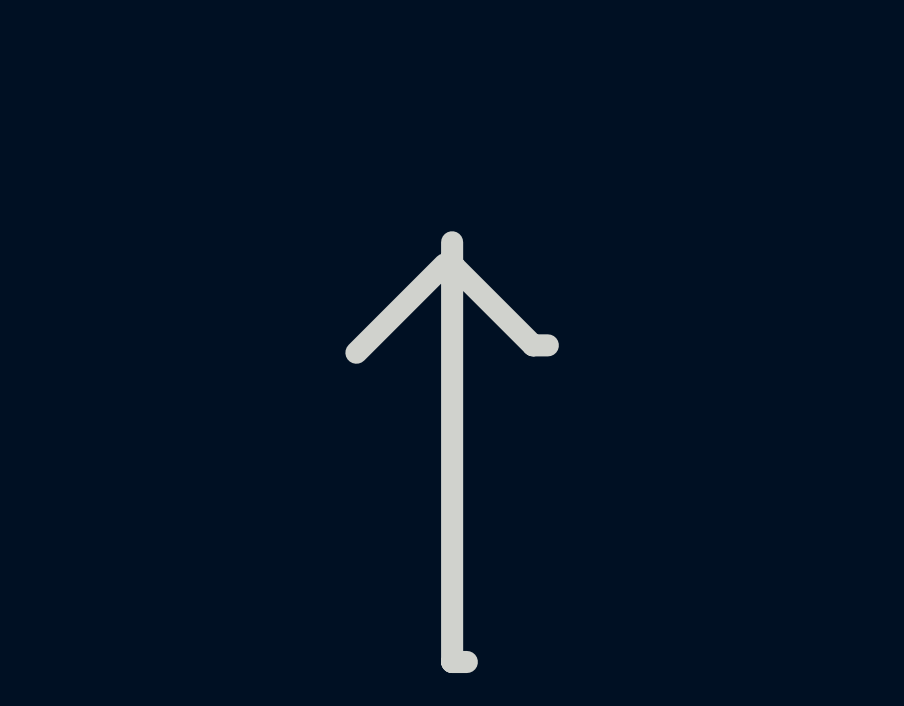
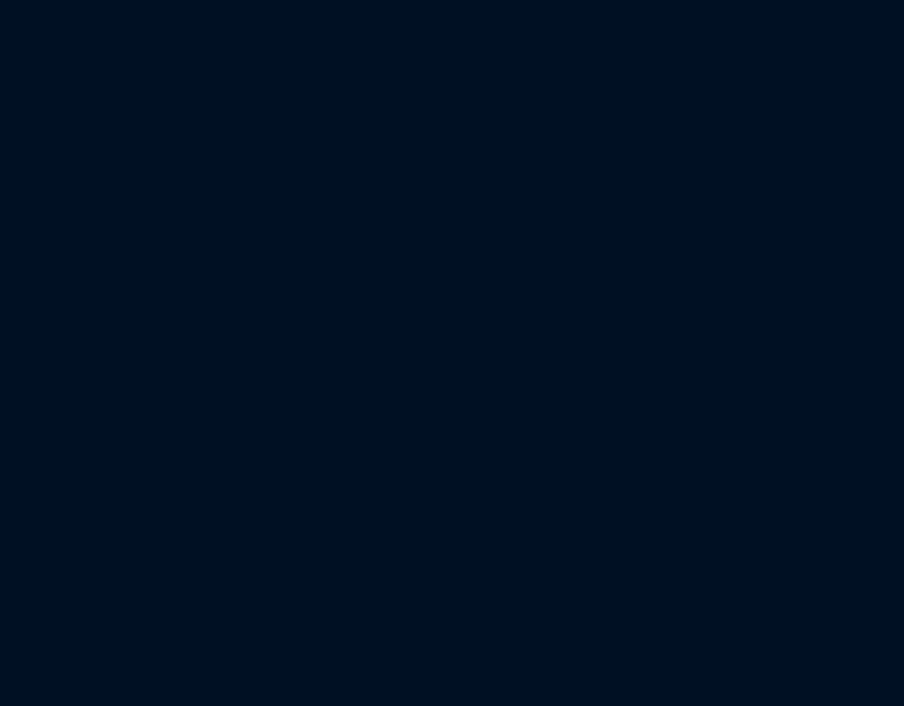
board edge: (452, 242) (452, 662) (466, 662) -> none
board edge: (444, 264) (356, 352) -> none
board edge: (452, 264) (533, 345) (547, 345) -> none

